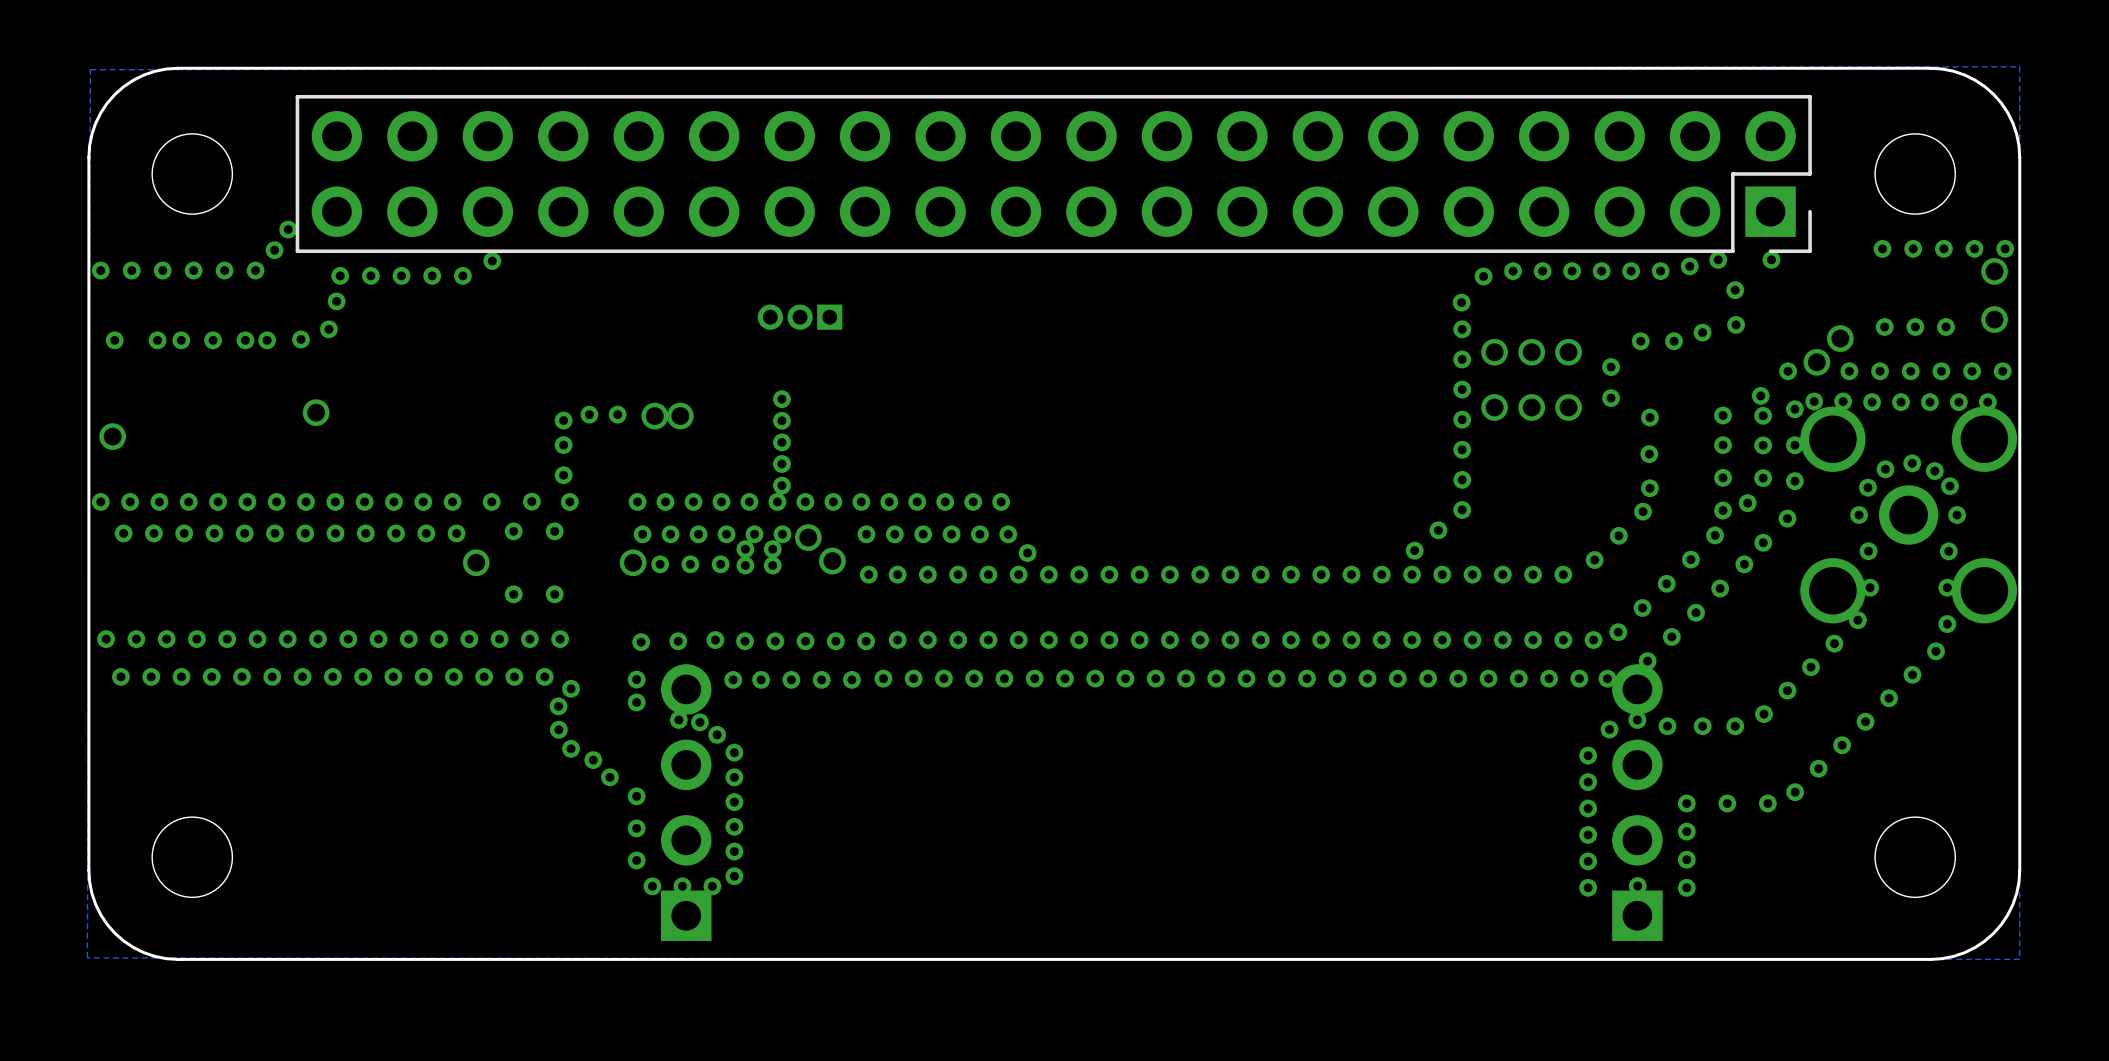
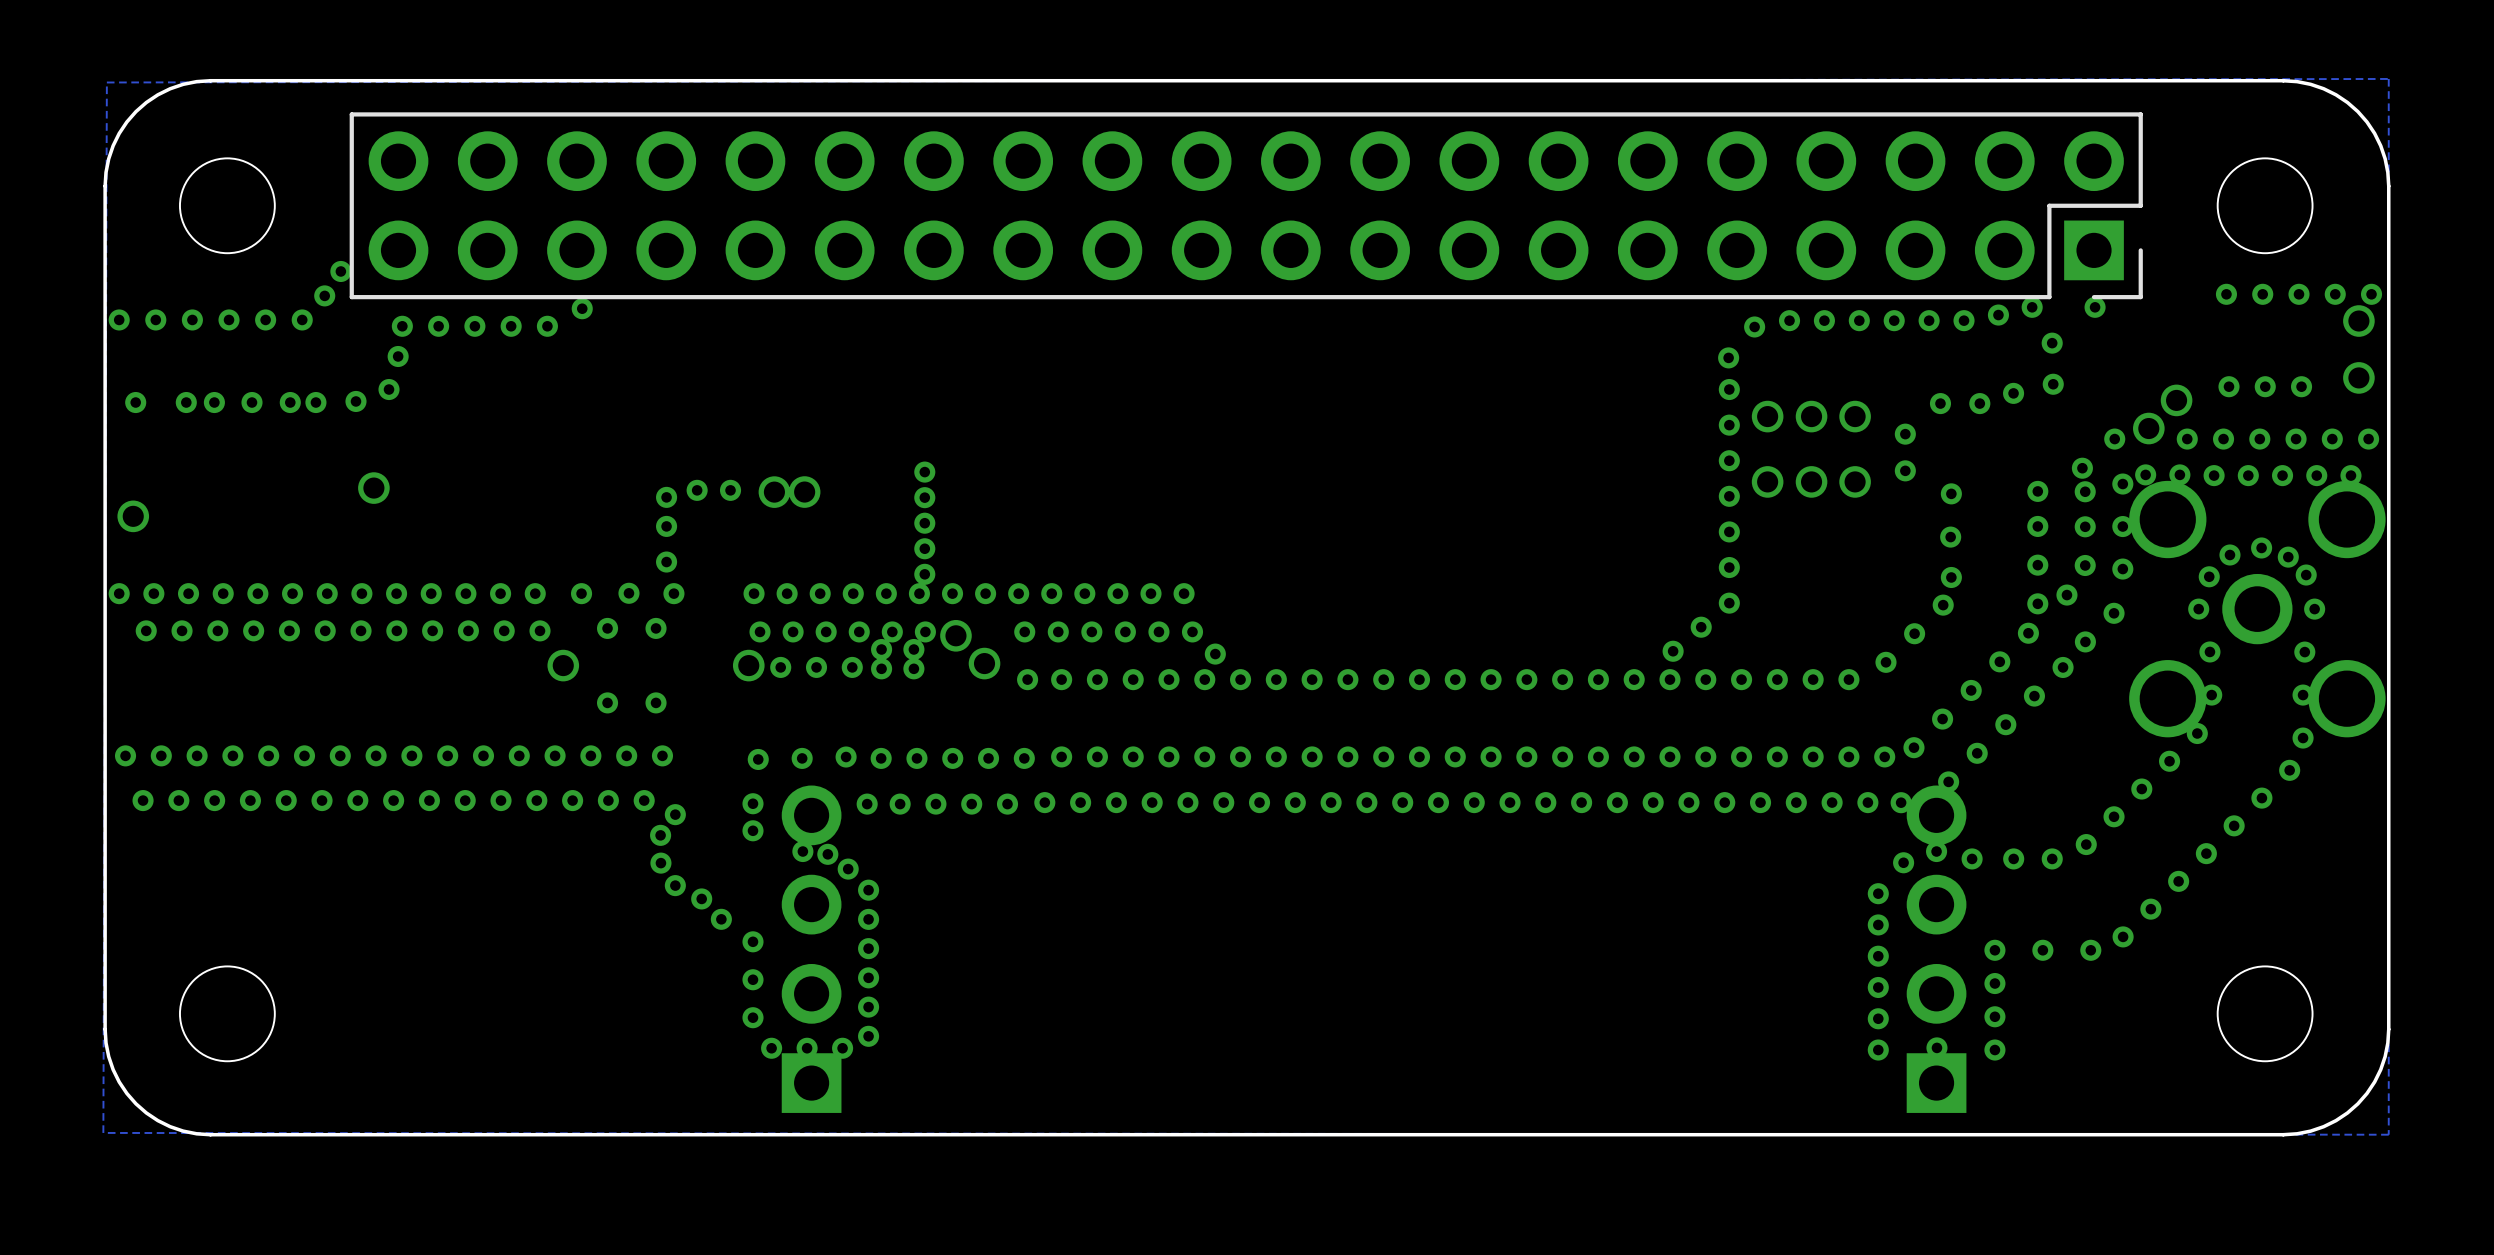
part: (800, 317) -> none

